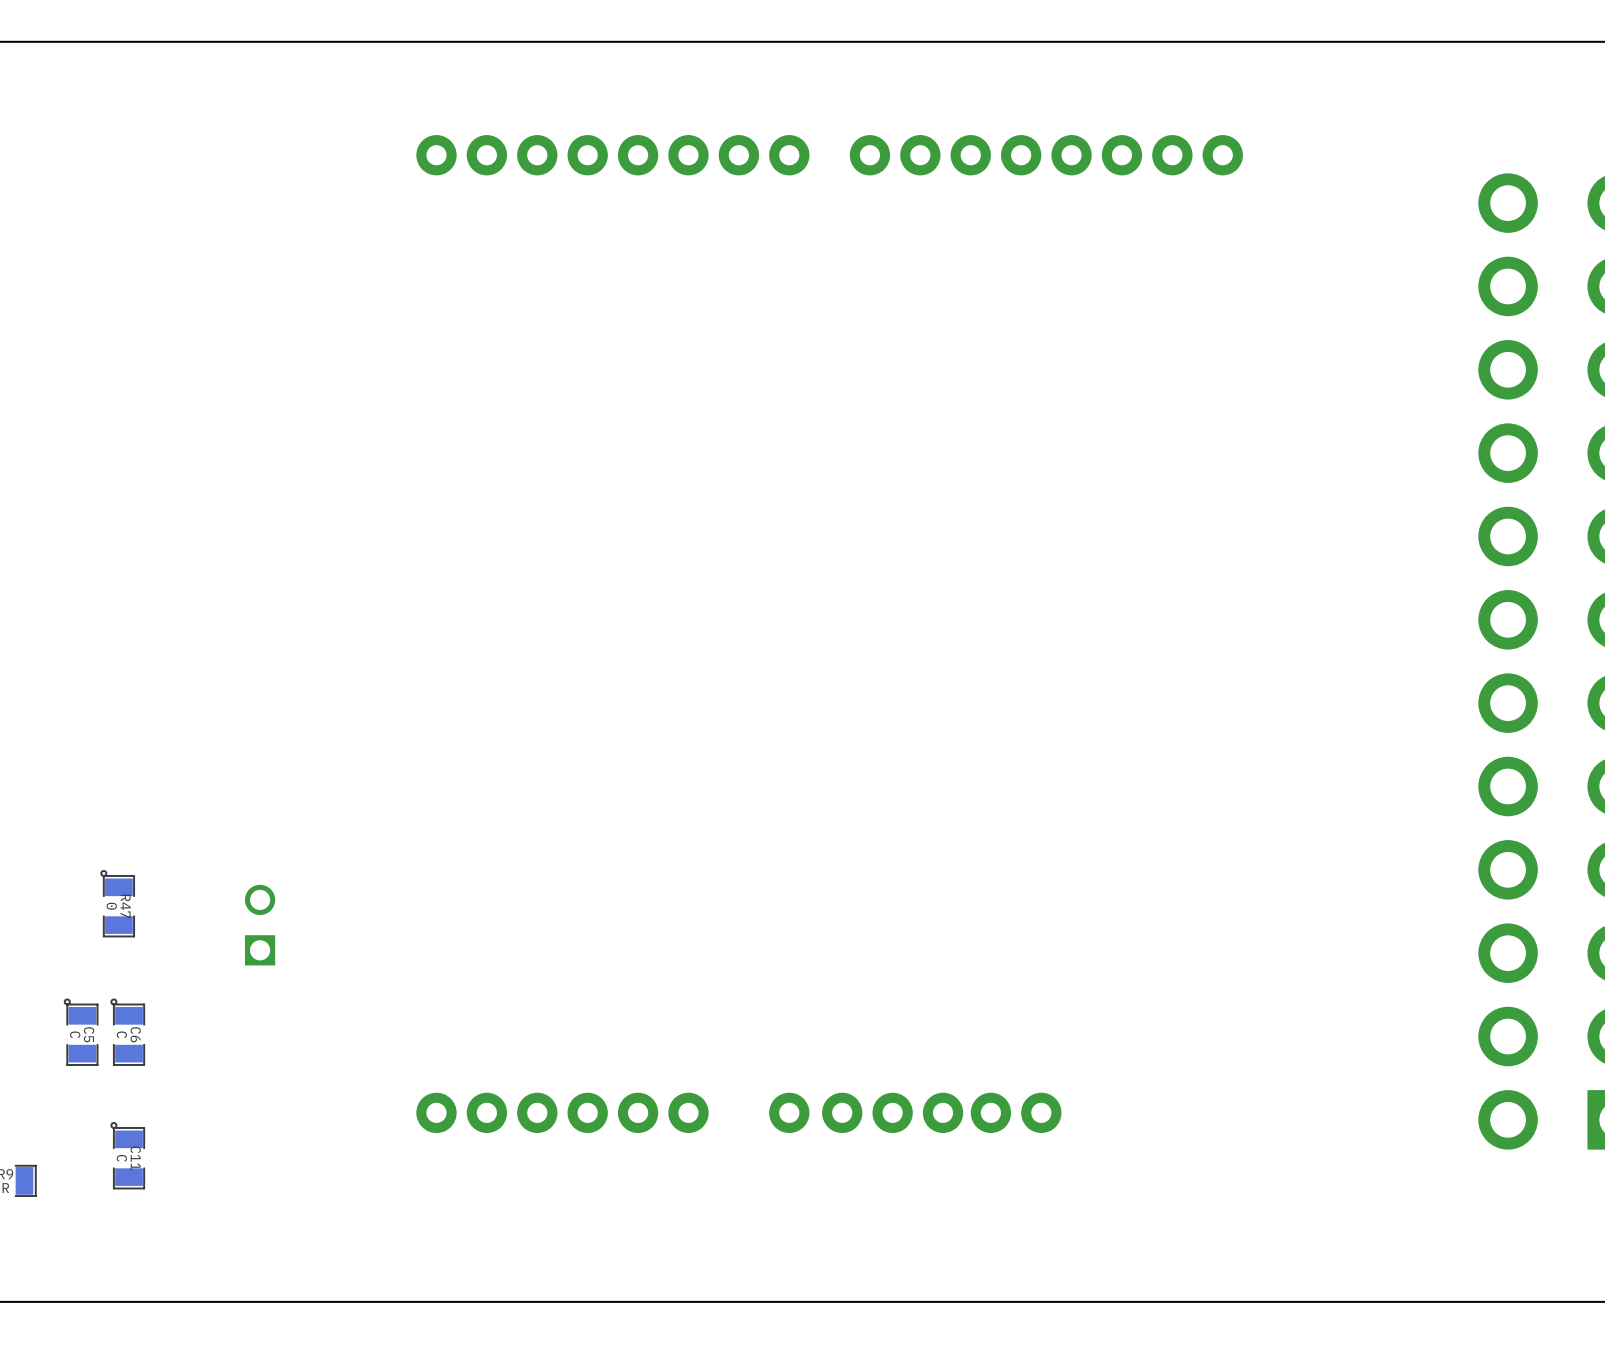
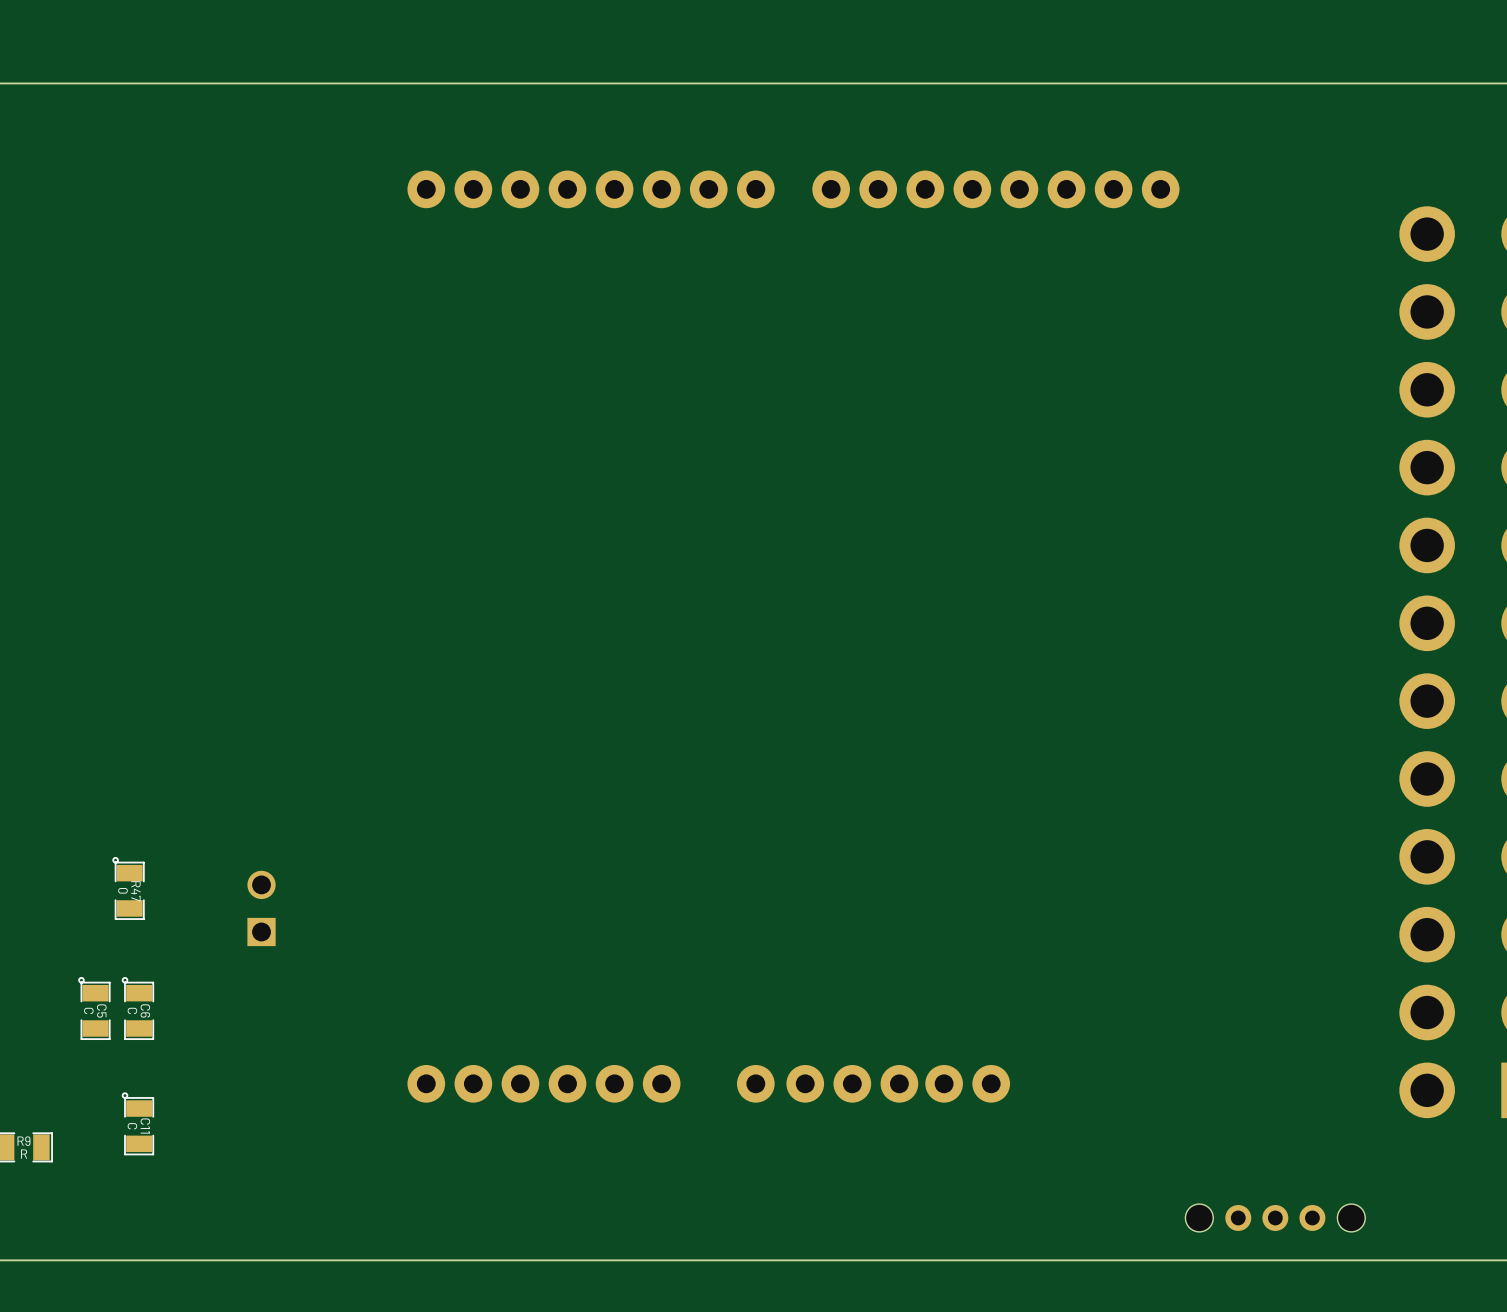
part: none -> (1275, 1217)

